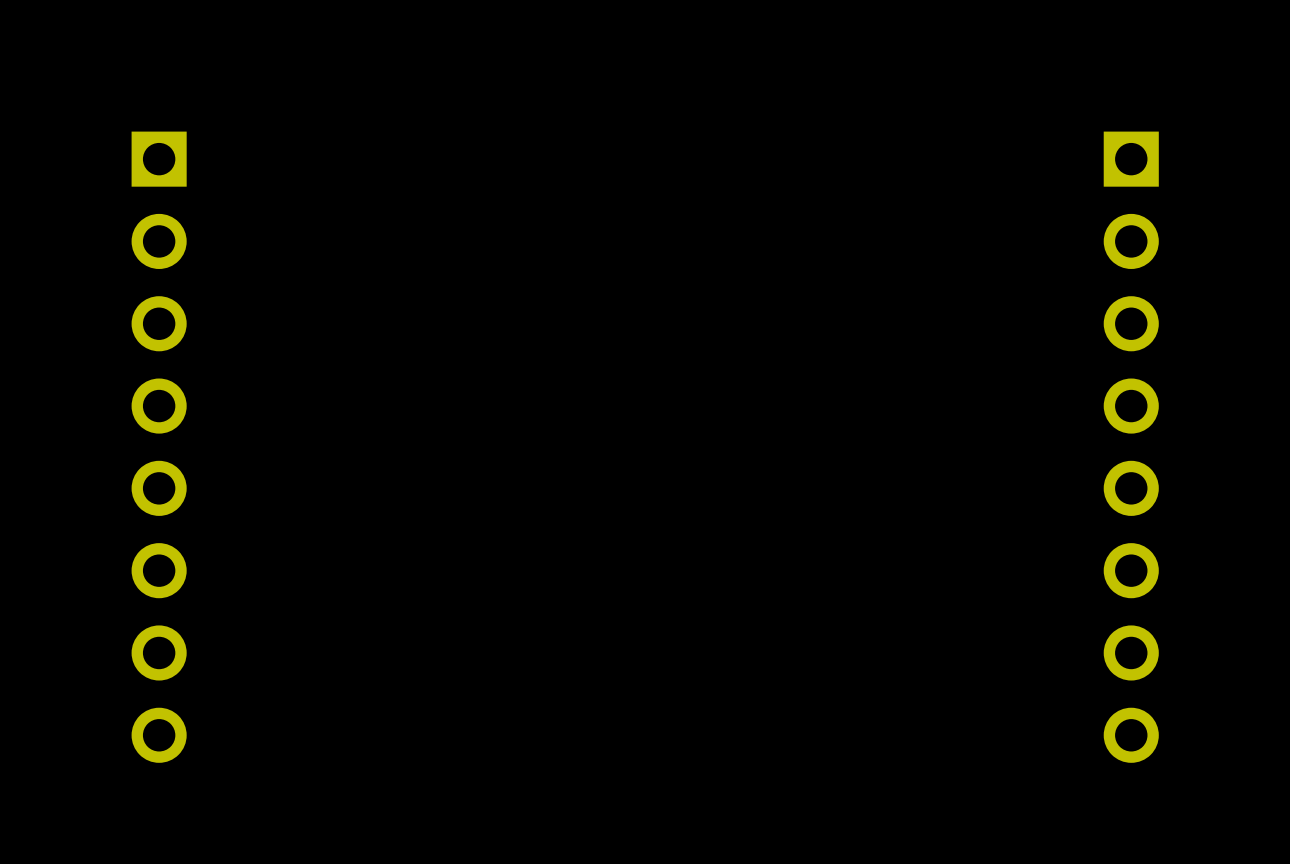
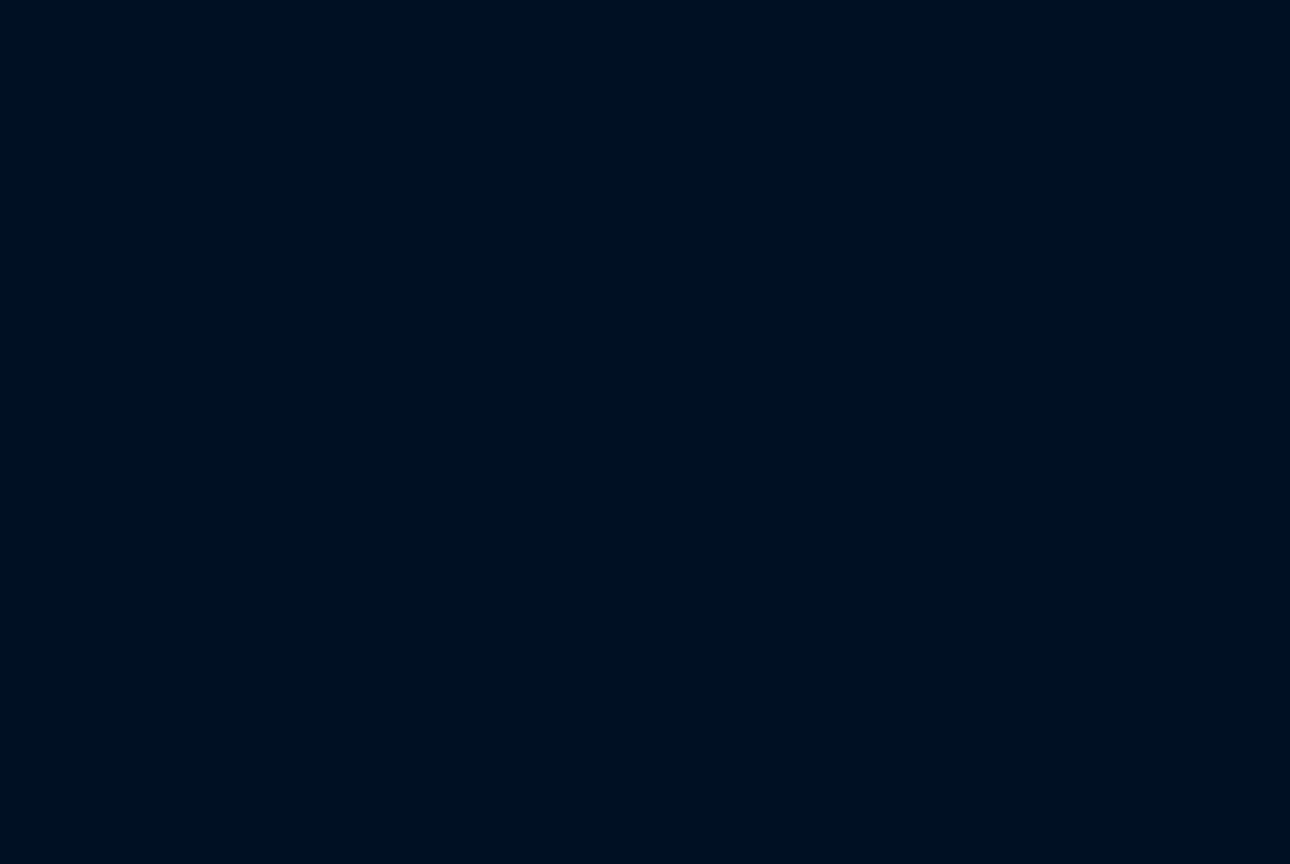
part: (159, 447) -> none
part: (1131, 447) -> none

